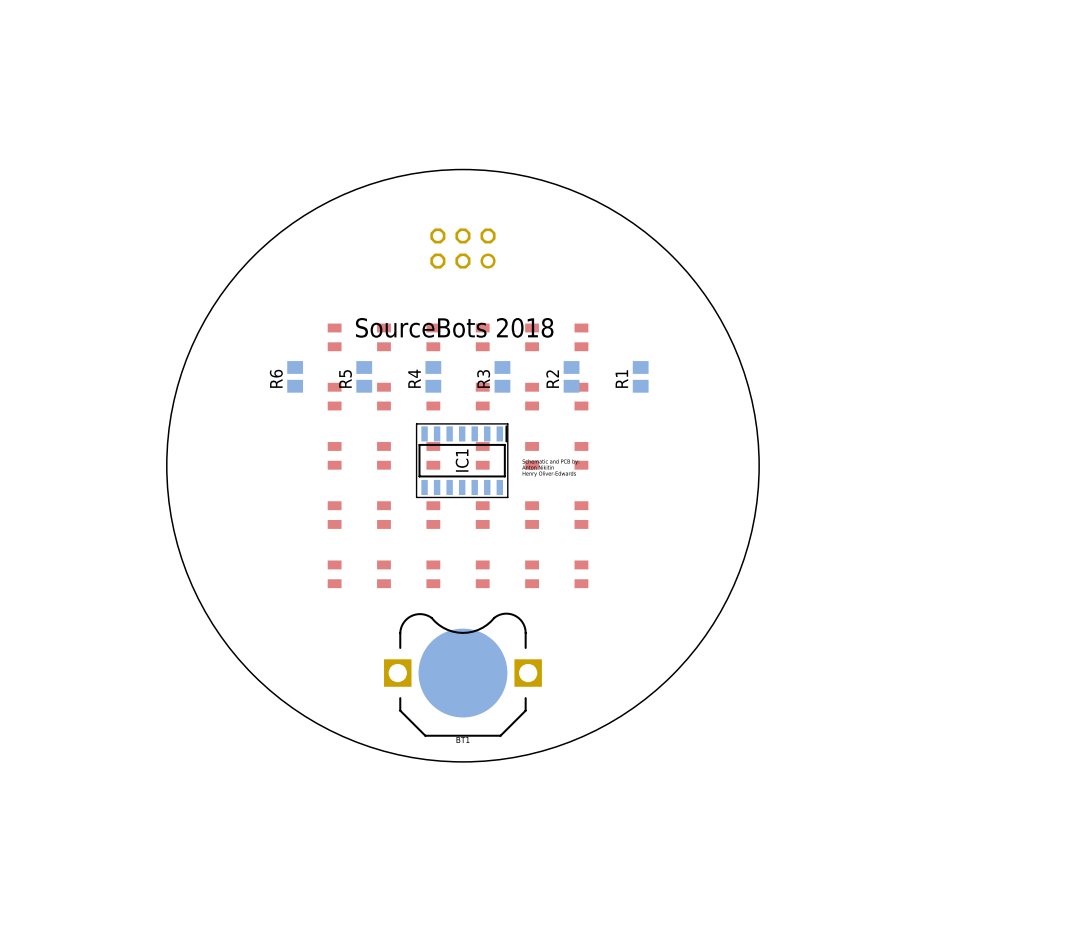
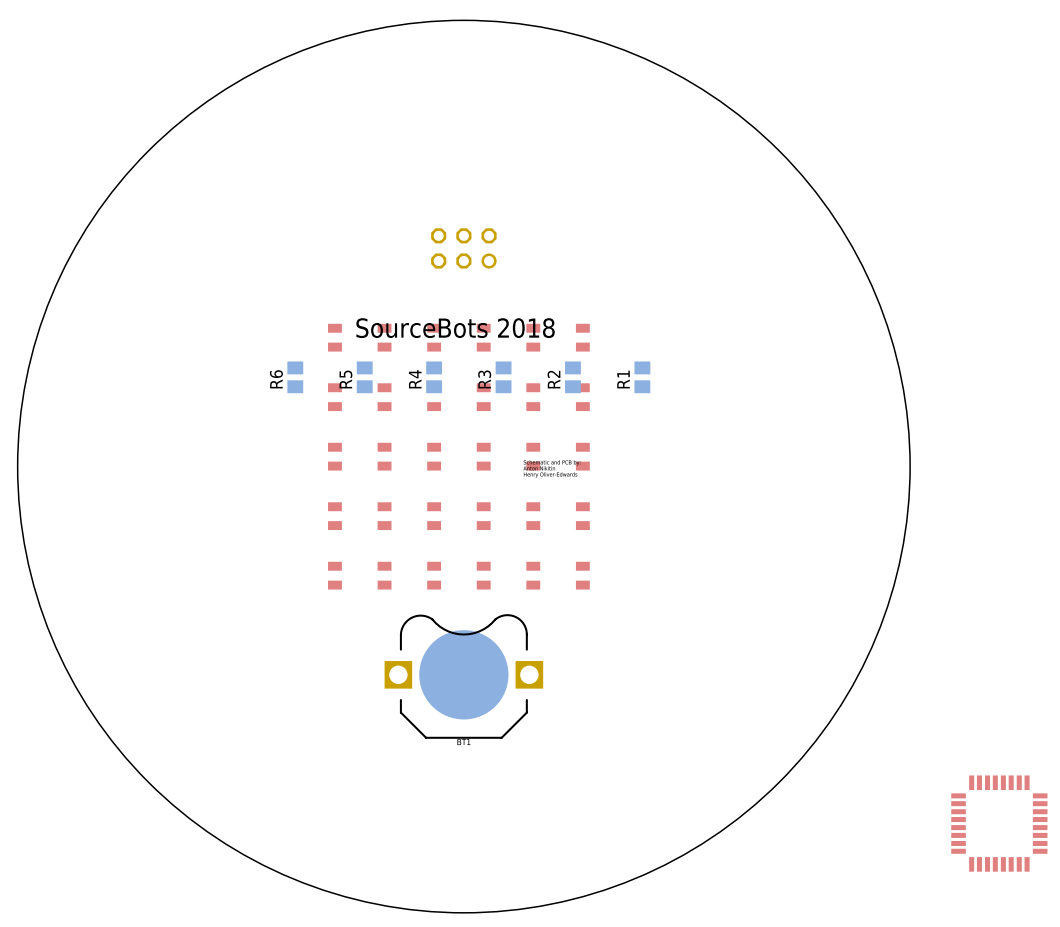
round board edge size: [166, 168, 760, 763] -> [16, 19, 911, 914]
IC1: (462, 460) -> none
part: none -> (999, 823)

